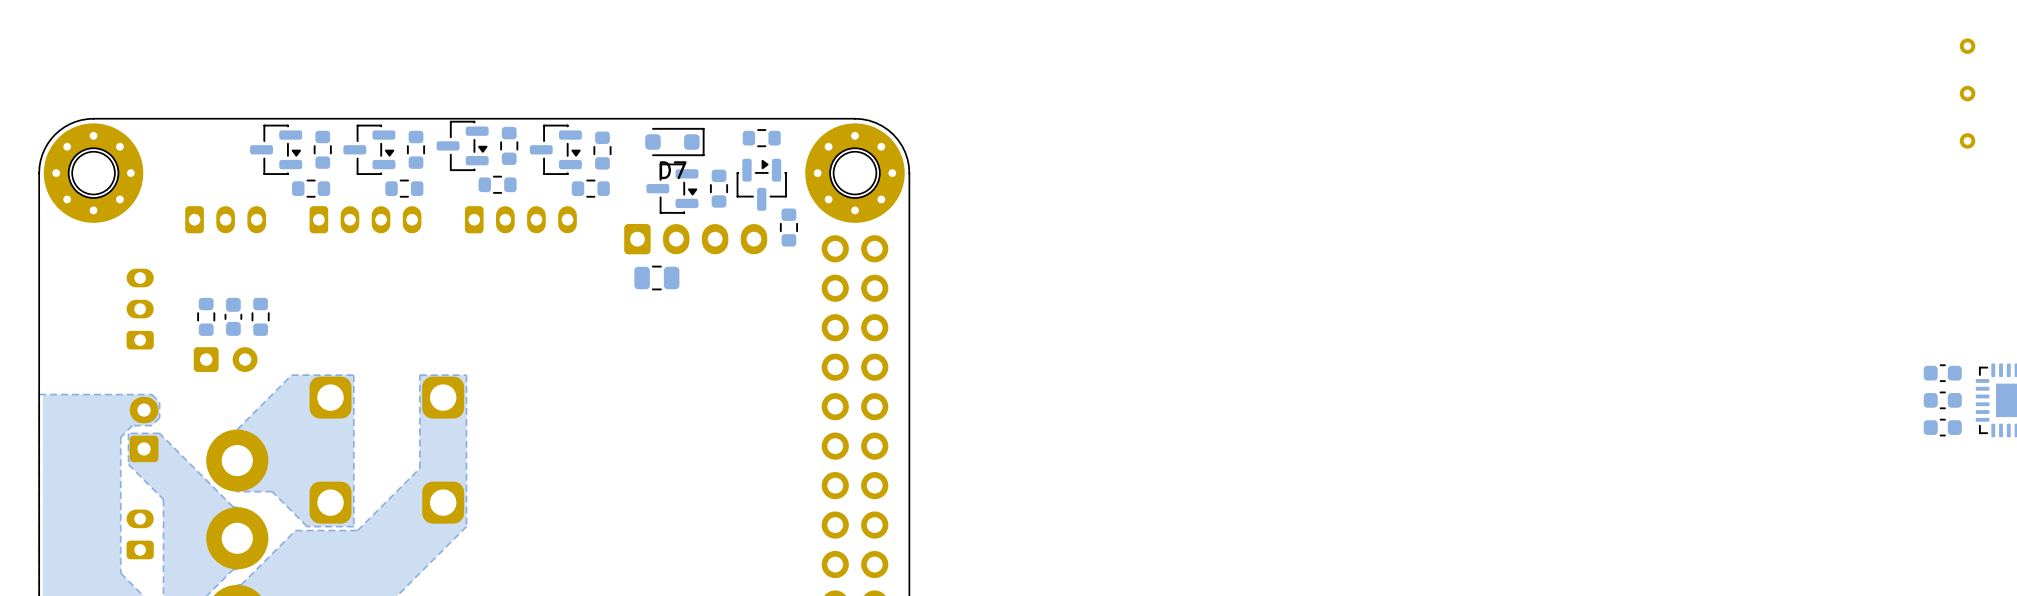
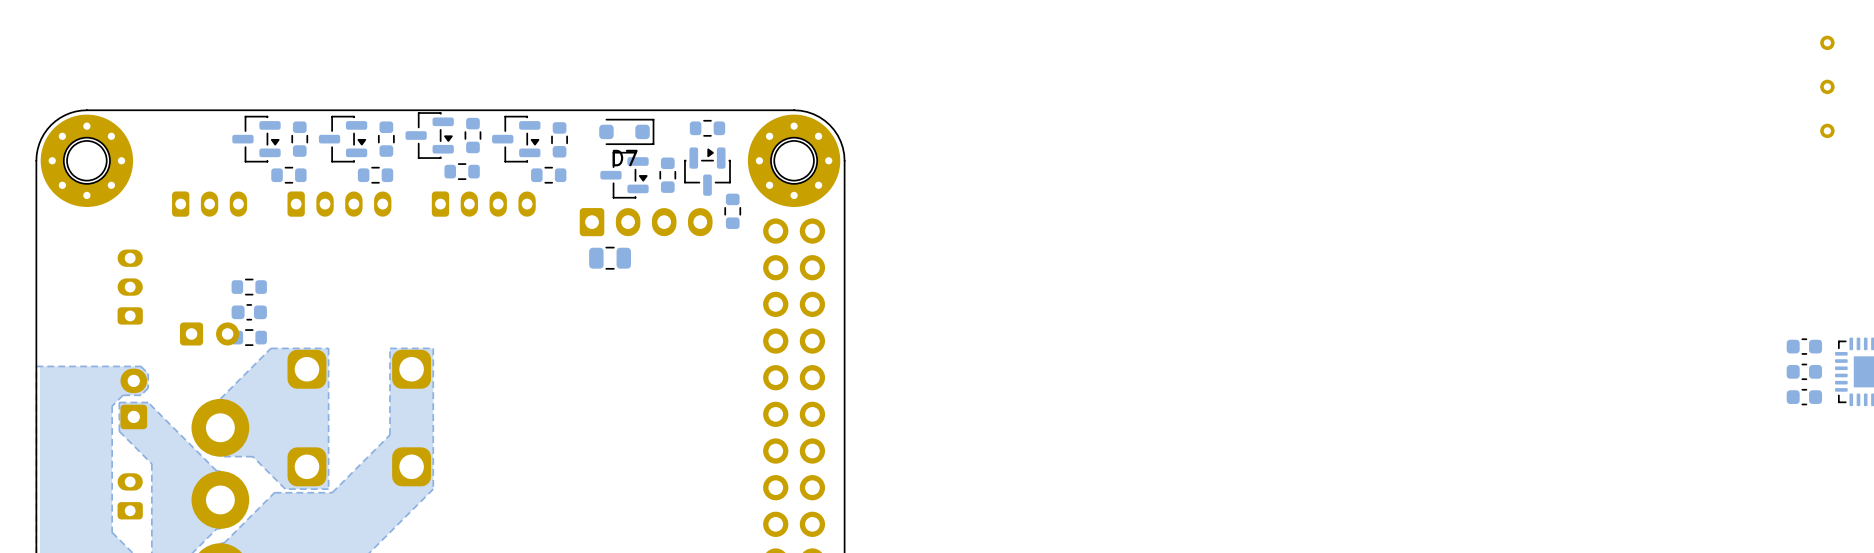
part: (206, 316) -> none
part rotation: 0° (233, 316) -> 90° clockwise (249, 312)
part position: (233, 316) -> (249, 312)
part rotation: 0° (260, 316) -> 90° clockwise (249, 287)
part: none -> (249, 337)

